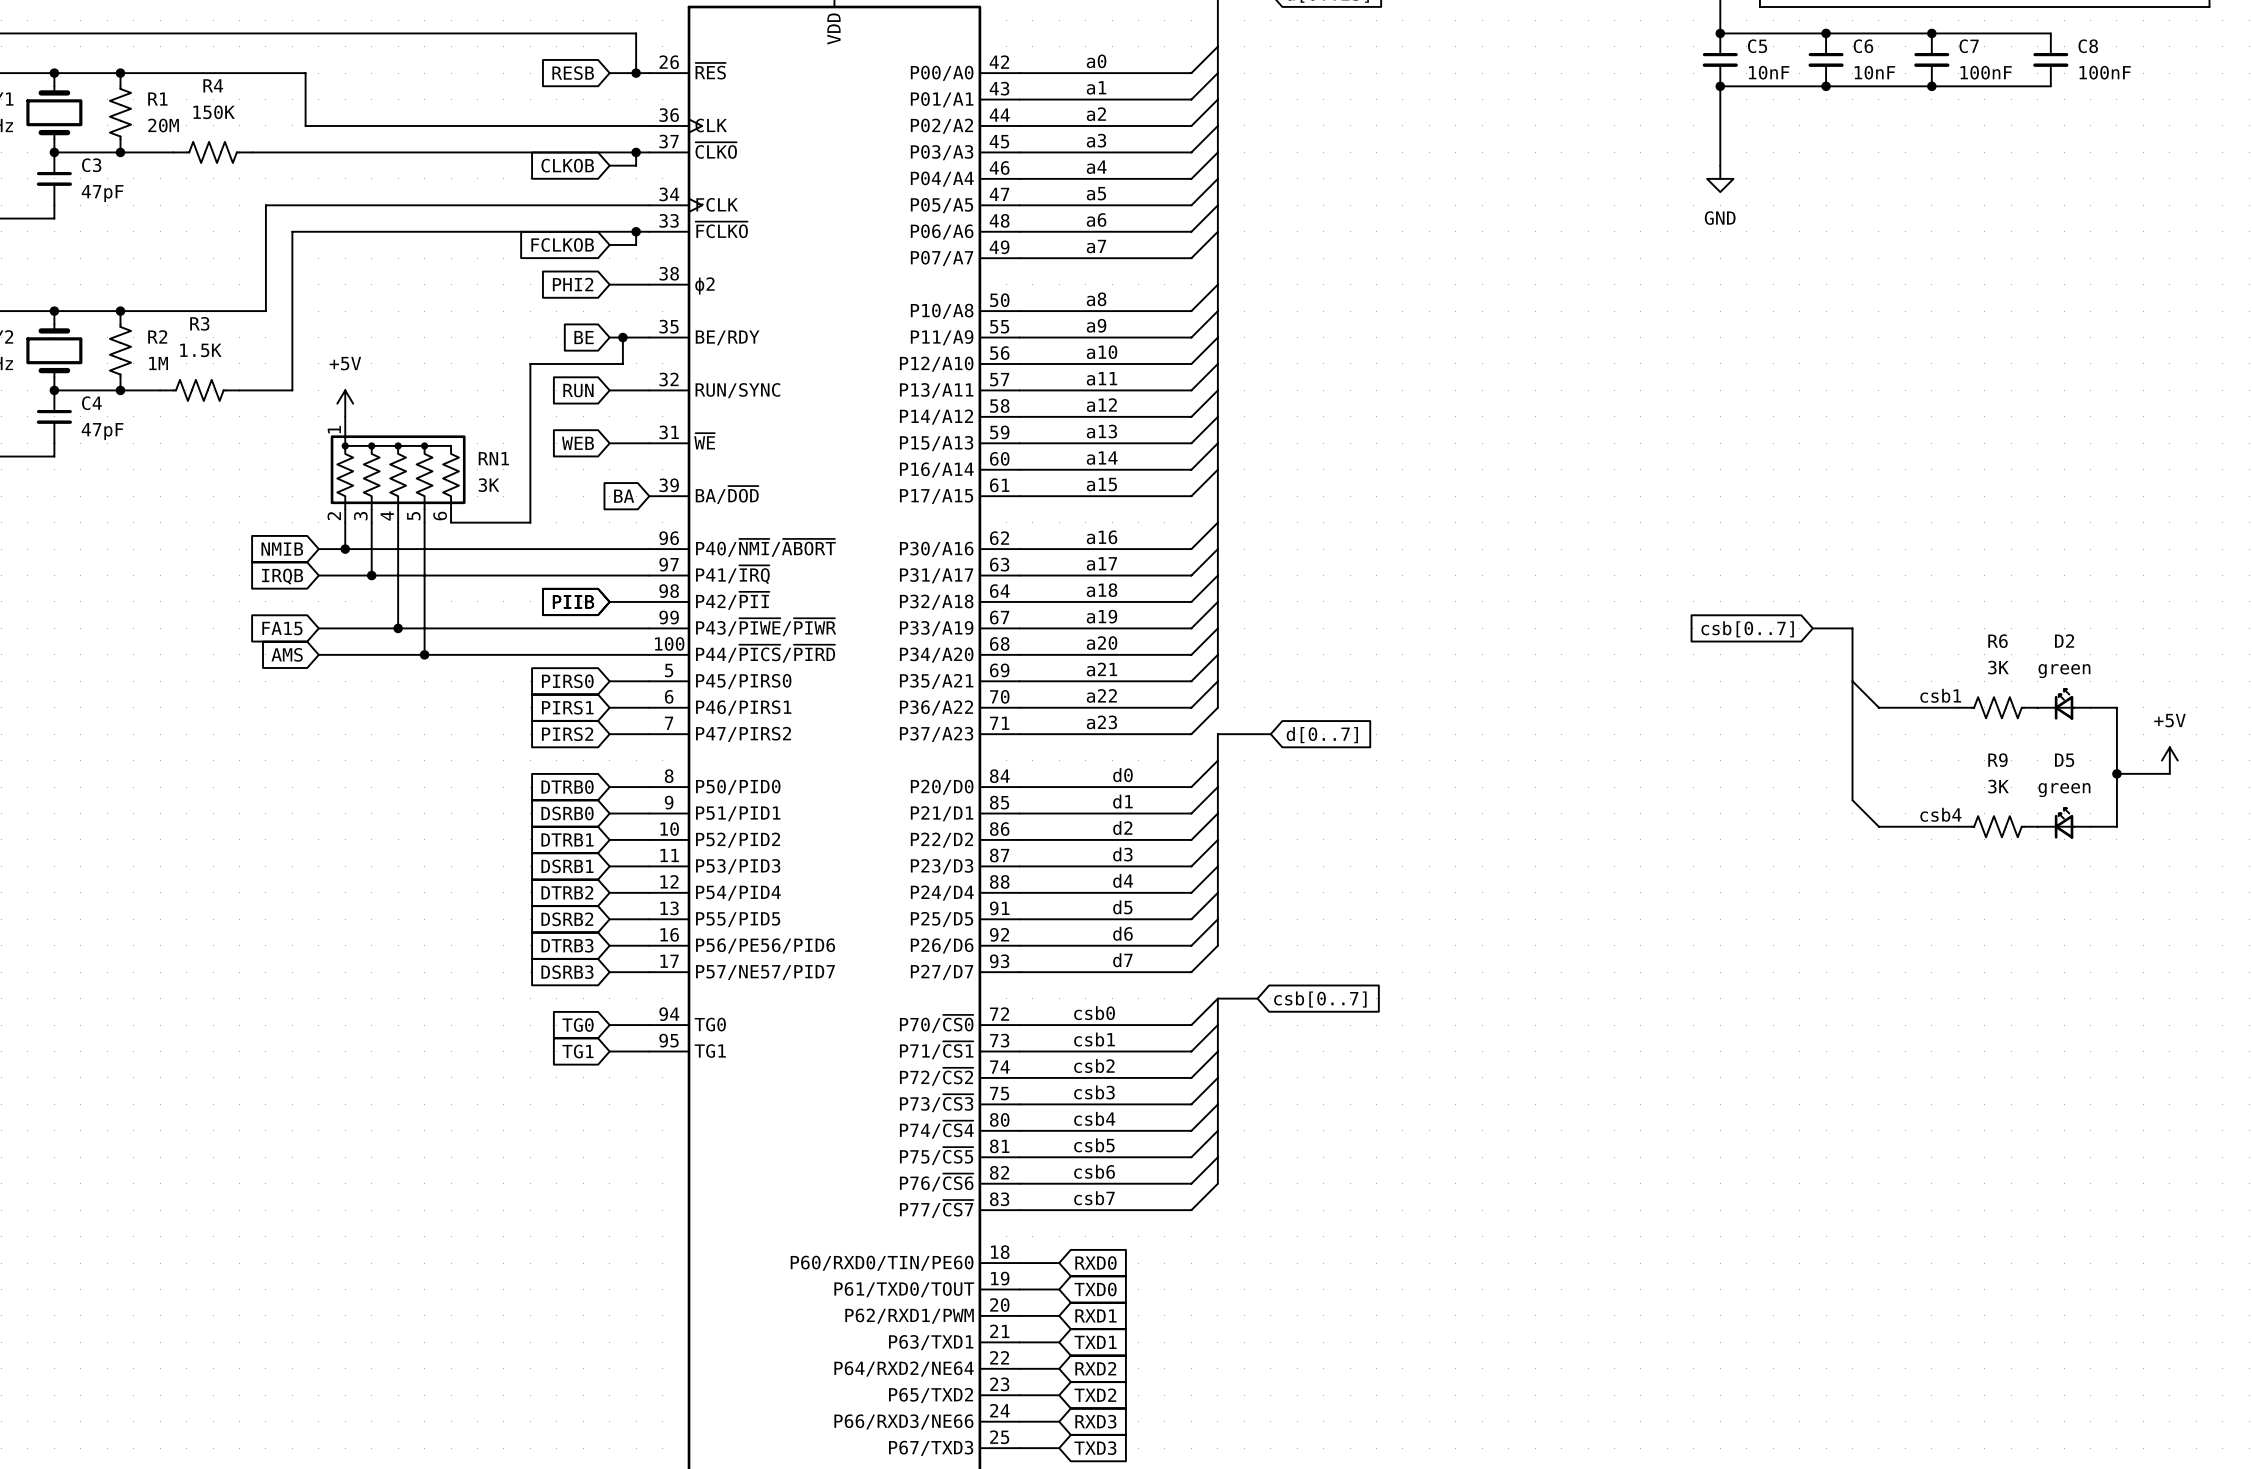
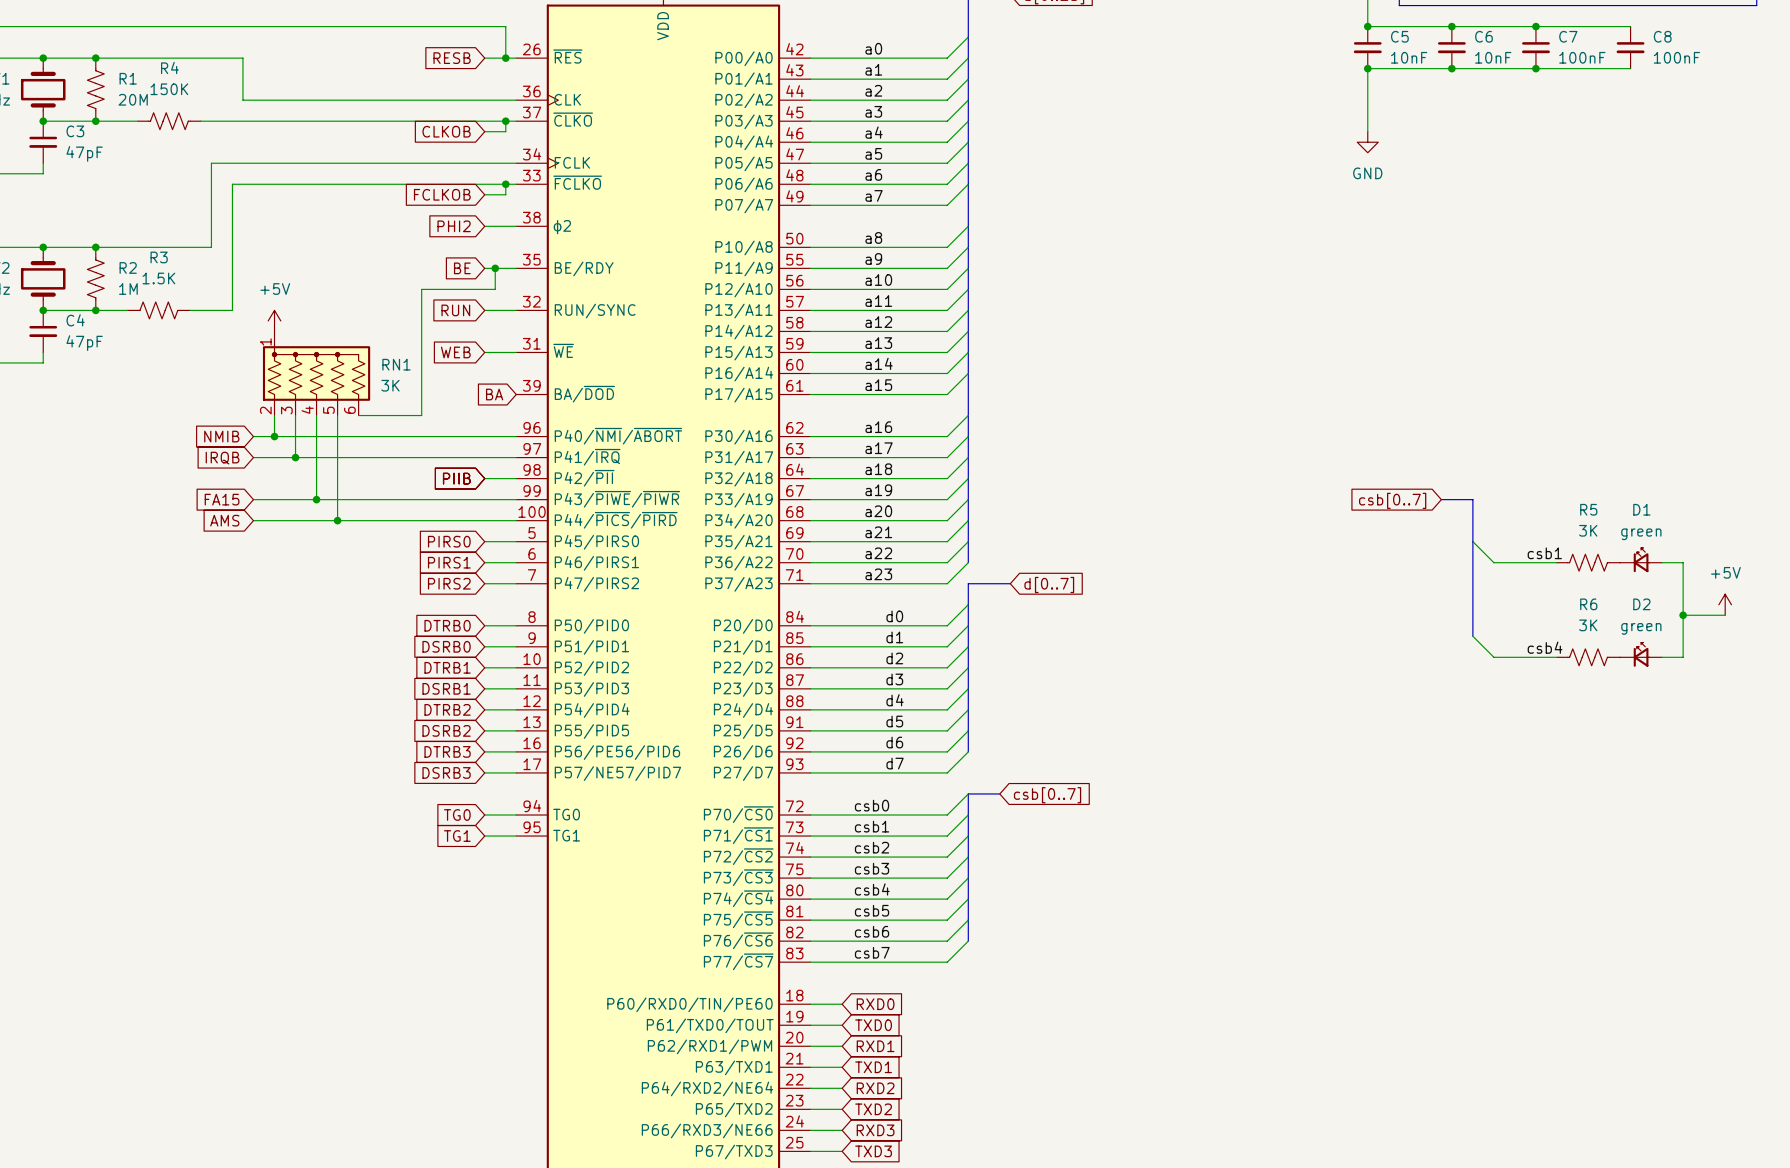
R6 name: R6 (1997, 641) -> R5 (1588, 509)
D2 name: D2 (2064, 641) -> D1 (1641, 509)
R9 name: R9 (1997, 760) -> R6 (1588, 604)
D5 name: D5 (2064, 760) -> D2 (1641, 604)

